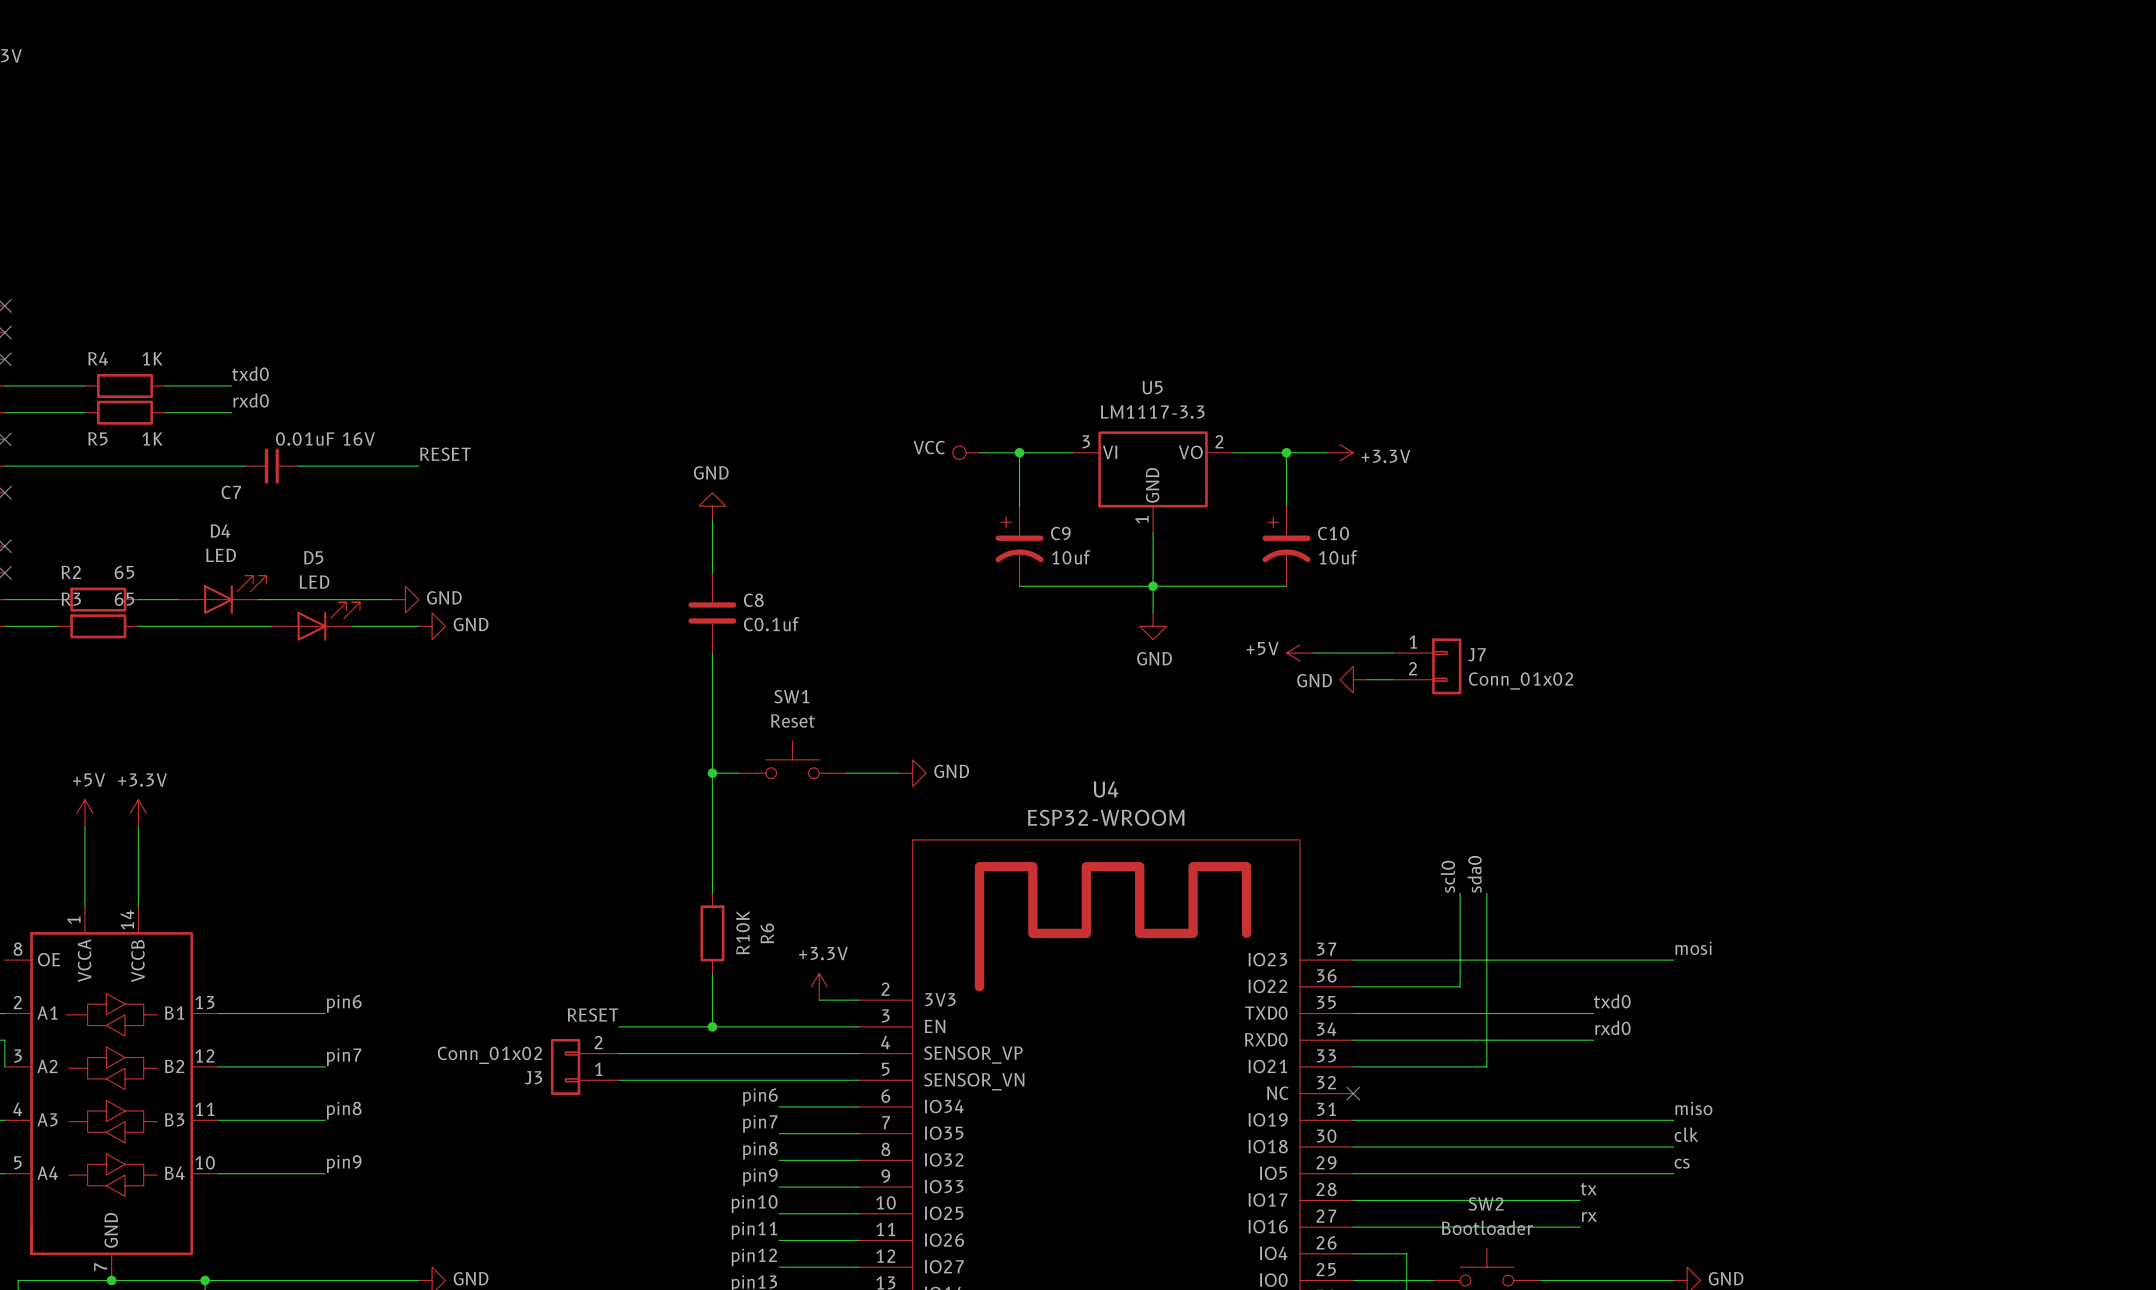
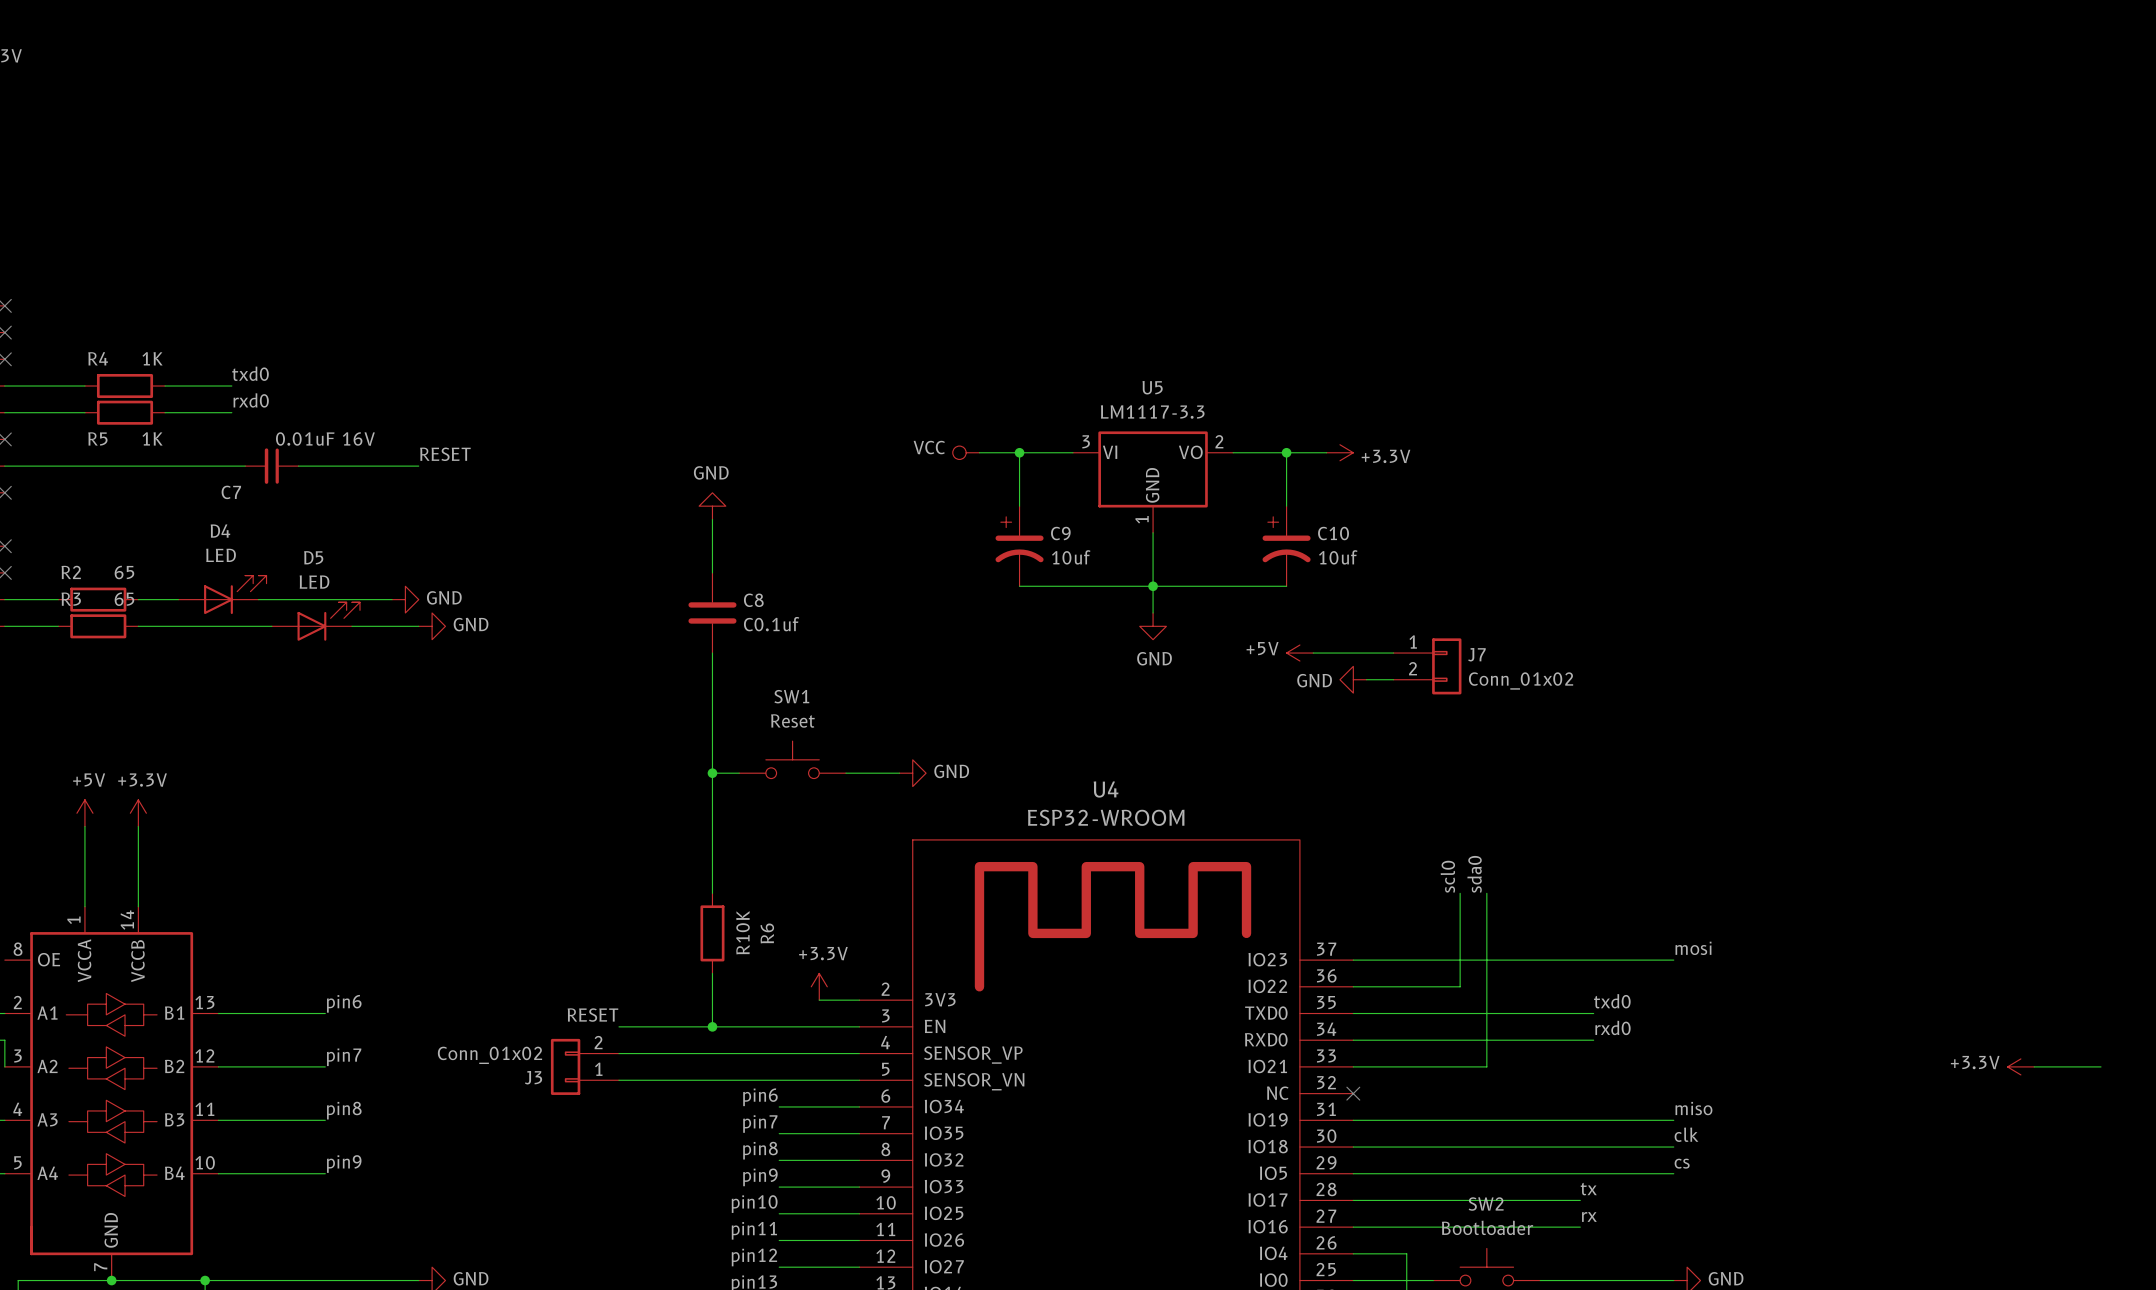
power symbol: none -> +3.3V (2020, 1066)
wire: none -> (2034, 1066) (2100, 1066)

